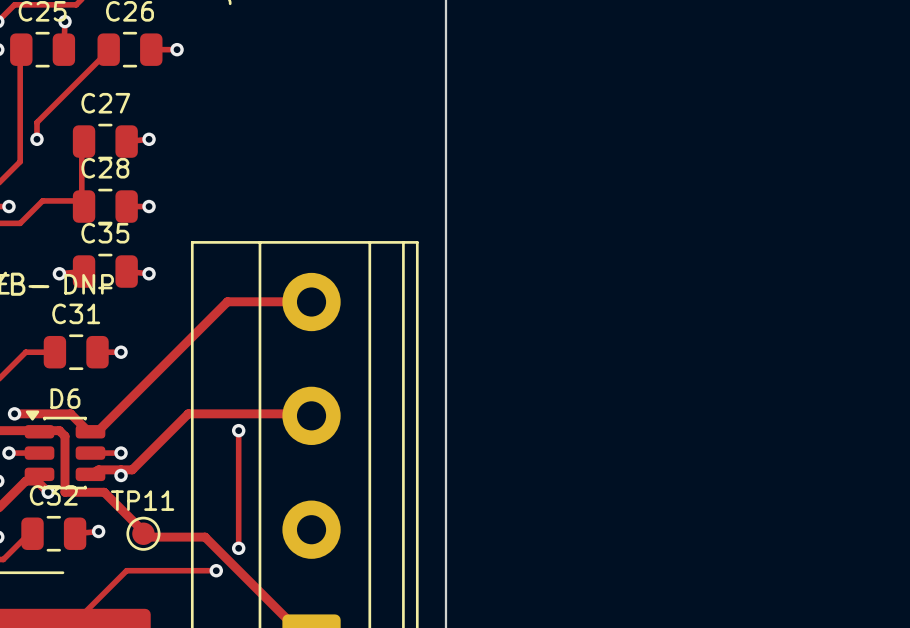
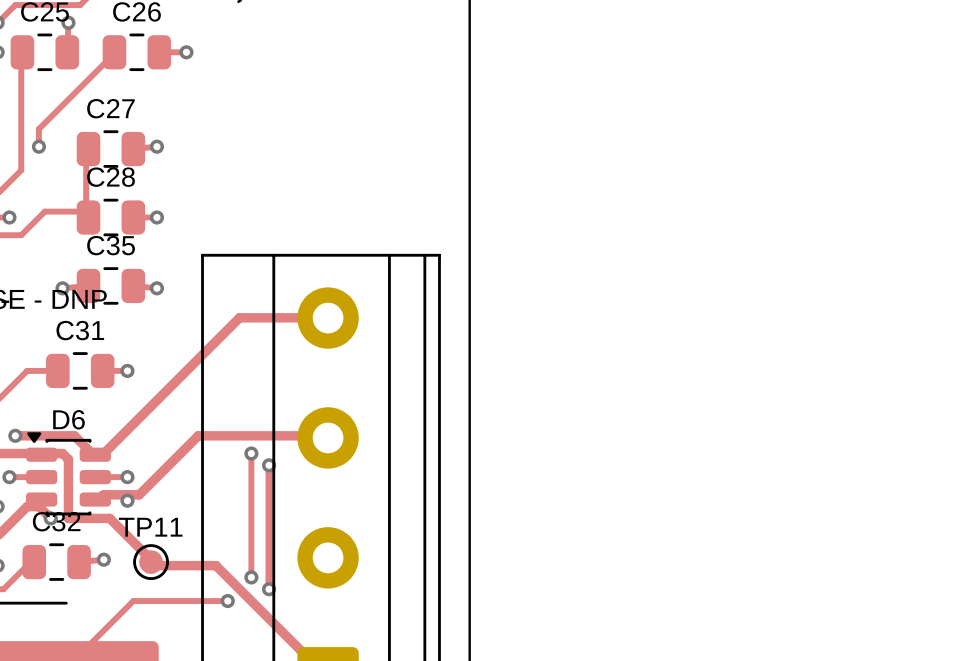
track: none -> (269, 465) (269, 589)
via: none -> (269, 465)
via: none -> (269, 589)

